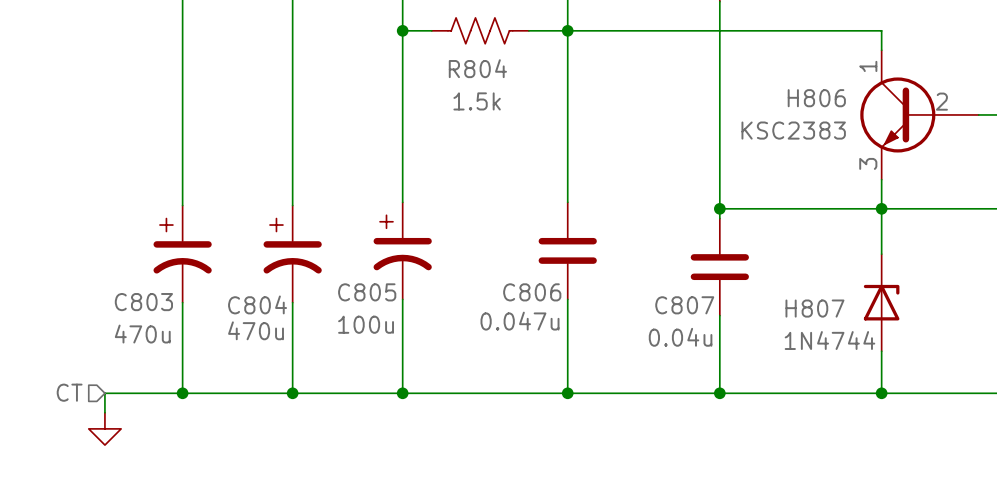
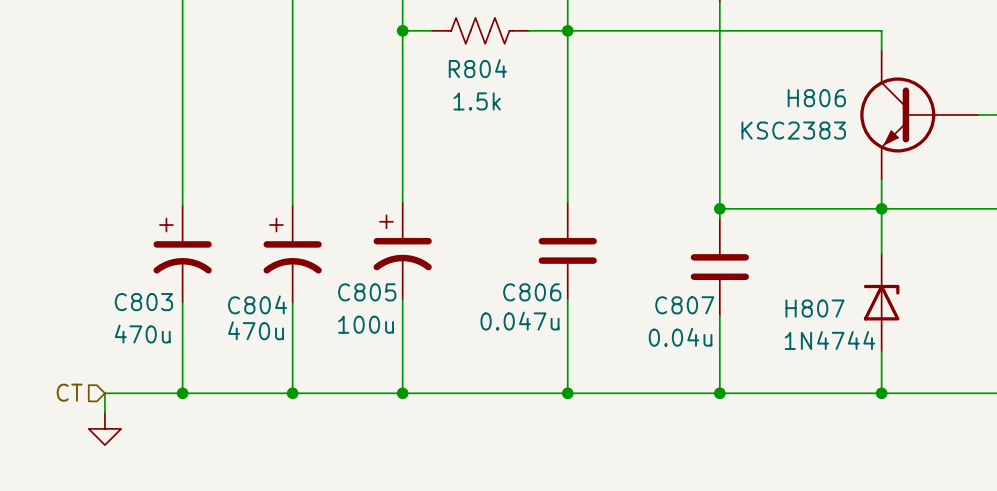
H806 pin number: 1 (868, 66) -> none
H806 pin number: 2 (941, 101) -> none
H806 pin number: 3 (868, 163) -> none

